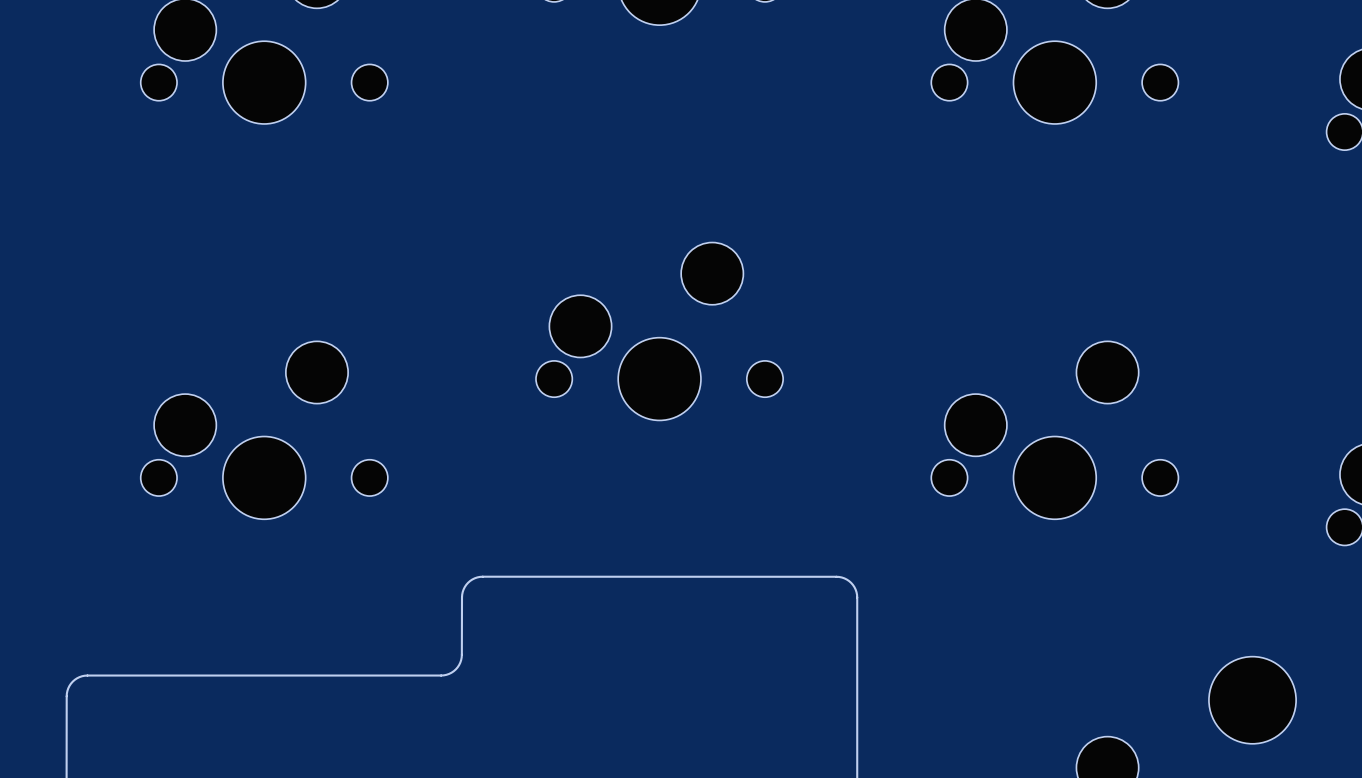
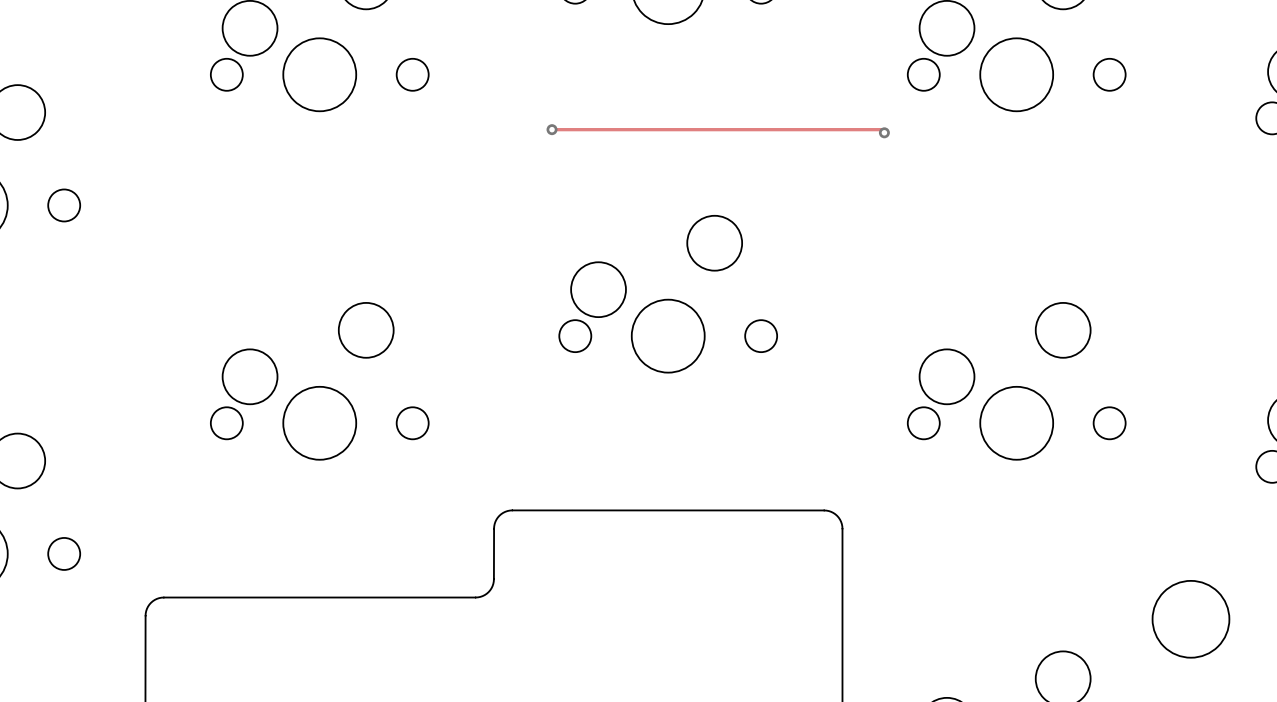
track: none -> (552, 129) (881, 129) (884, 132)
via: none -> (552, 129)
via: none -> (884, 132)

